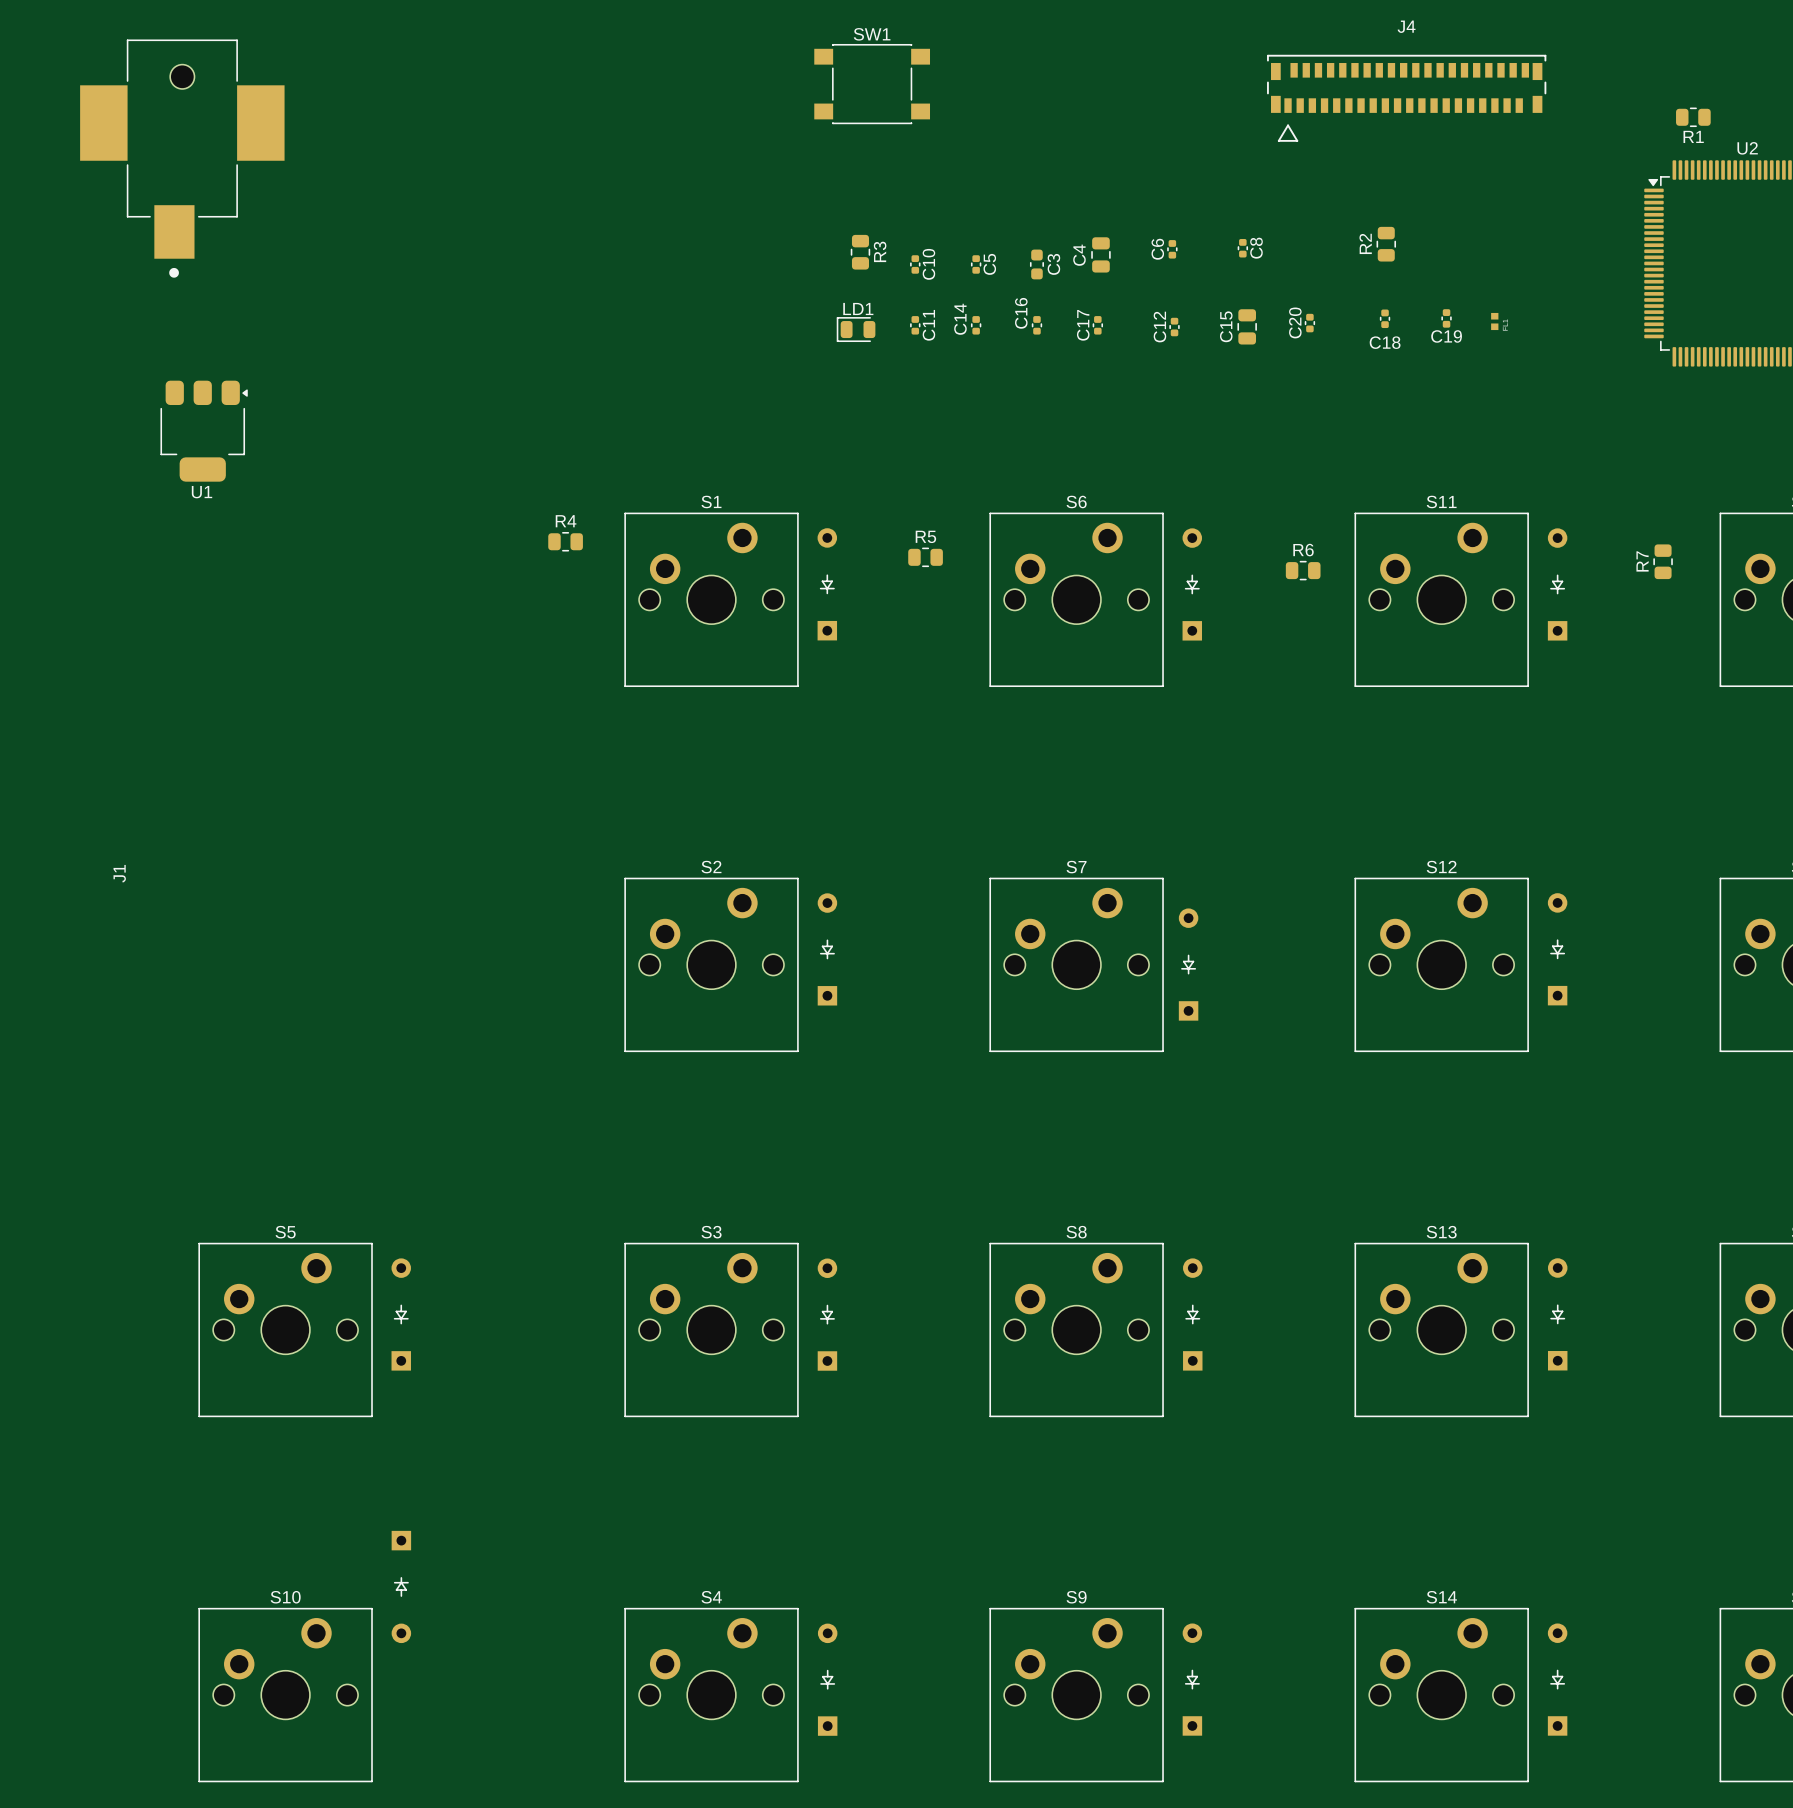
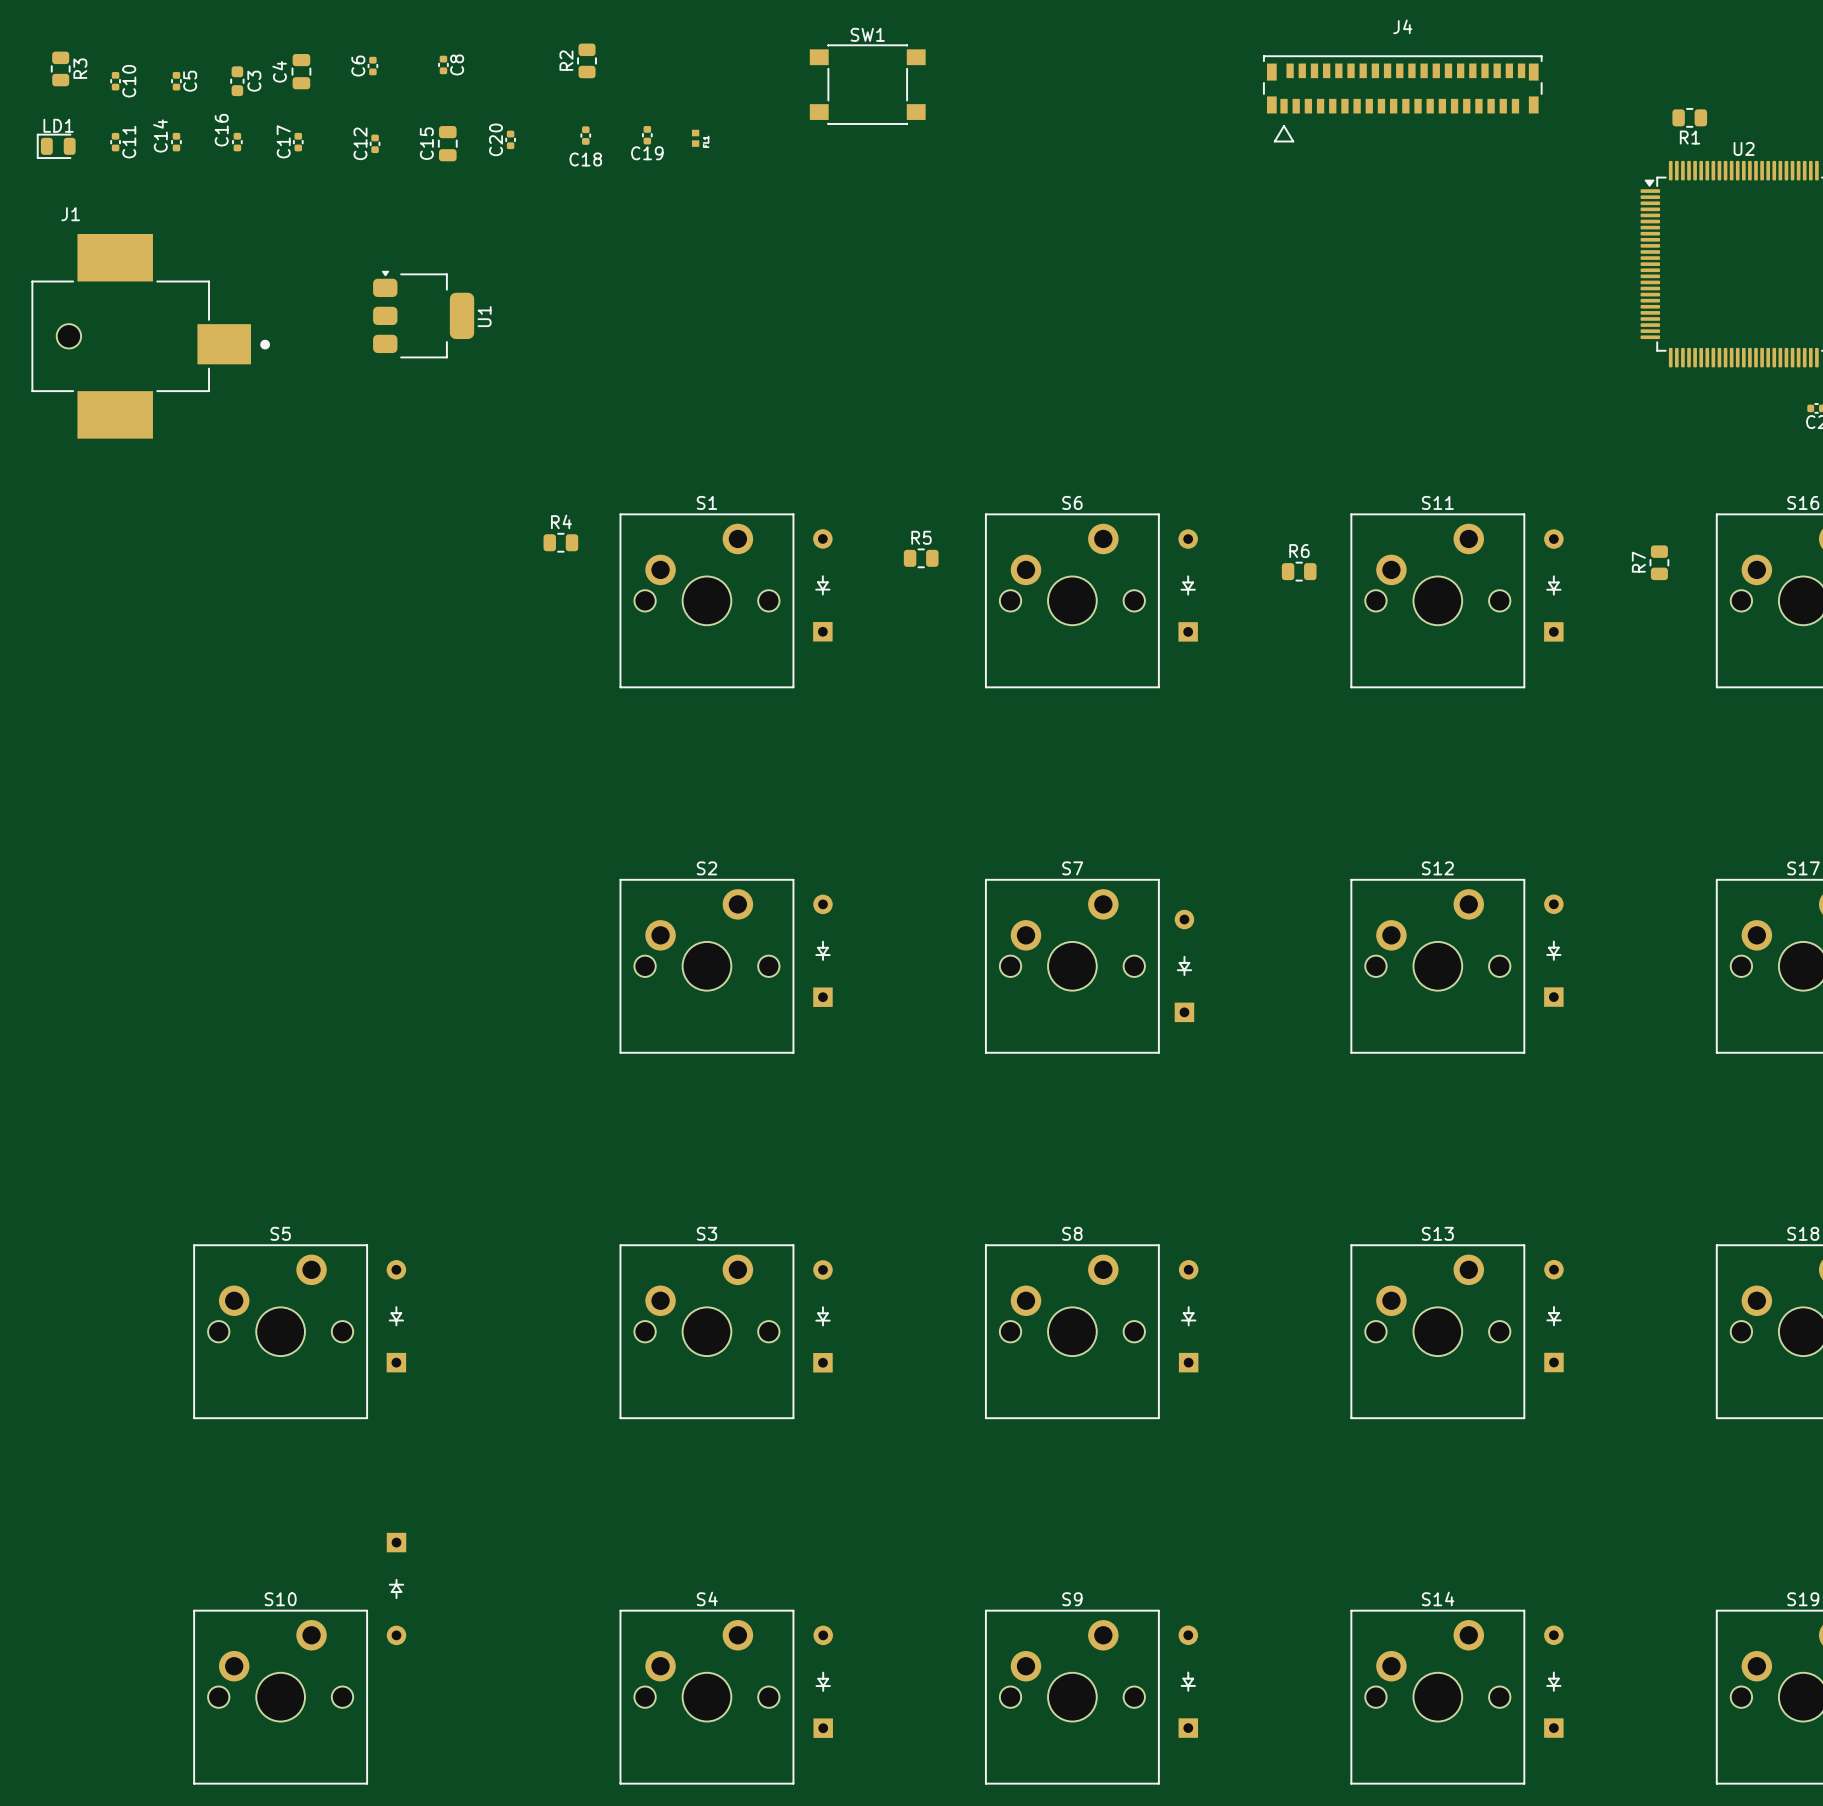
J1 rotation: 0° (182, 158) -> 90° counterclockwise (150, 336)
J1 position: (182, 158) -> (150, 336)
R2 position: (1386, 244) -> (587, 60)
C8 position: (1242, 248) -> (443, 64)
C6 position: (1172, 249) -> (372, 66)
R3 position: (860, 252) -> (60, 68)
C4 position: (1100, 254) -> (301, 71)
C10 position: (915, 264) -> (115, 81)
C5 position: (976, 264) -> (176, 81)
C3 position: (1036, 264) -> (237, 81)
C18 position: (1385, 318) -> (585, 135)
C19 position: (1446, 318) -> (647, 135)
part position: (1494, 321) -> (695, 138)
C20 position: (1309, 323) -> (510, 139)
C11 position: (915, 325) -> (115, 142)
C14 position: (976, 325) -> (176, 142)
C16 position: (1036, 325) -> (237, 142)
C17 position: (1097, 325) -> (298, 142)
C15 position: (1247, 326) -> (447, 143)
C12 position: (1174, 327) -> (375, 143)
LD1 position: (856, 329) -> (56, 146)
U1 rotation: 0° (204, 431) -> 90° counterclockwise (423, 314)
U1 position: (204, 431) -> (423, 314)
J1 name position: J1 (119, 873) -> J1 (70, 214)

